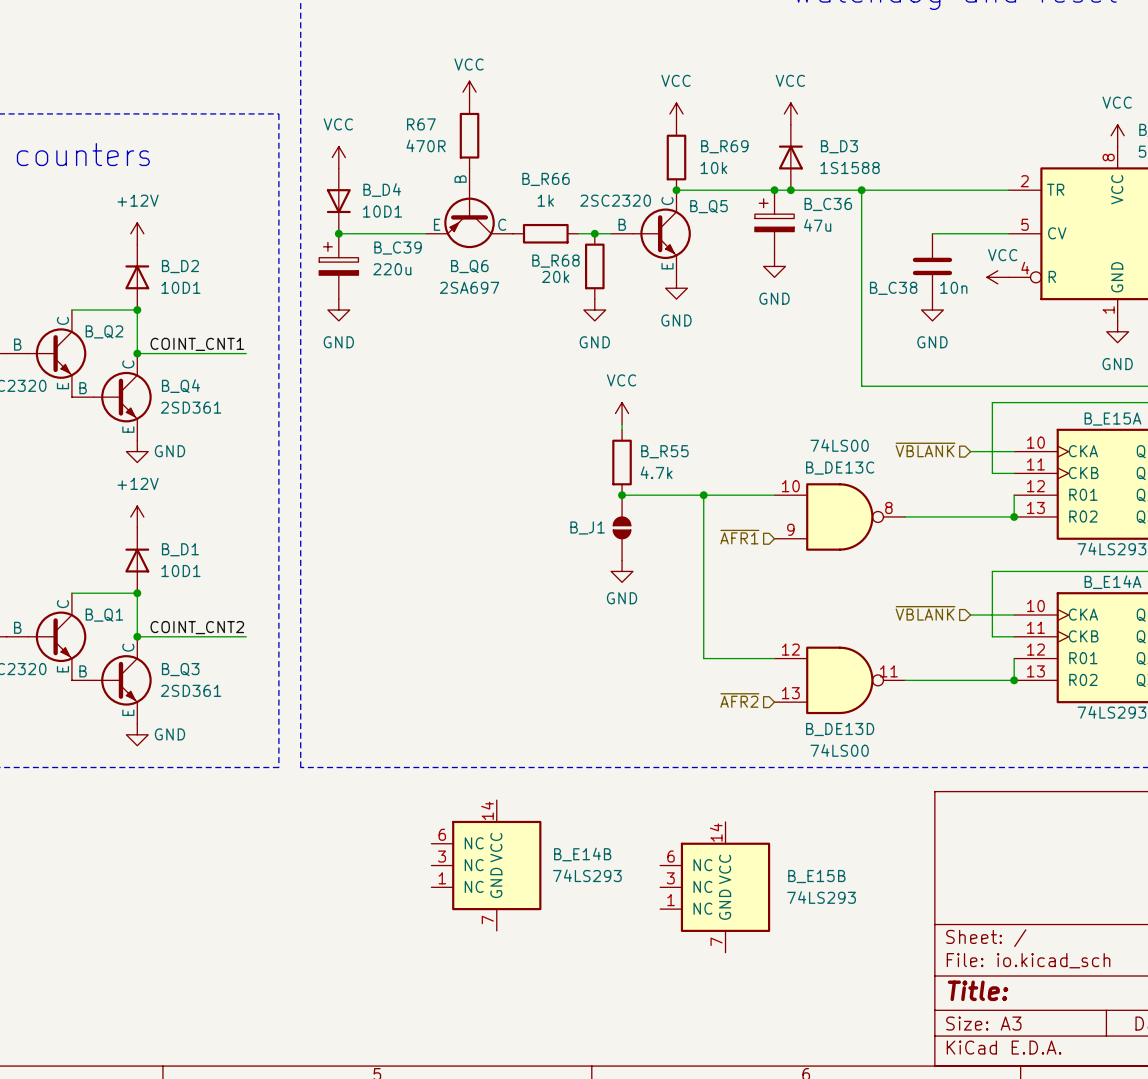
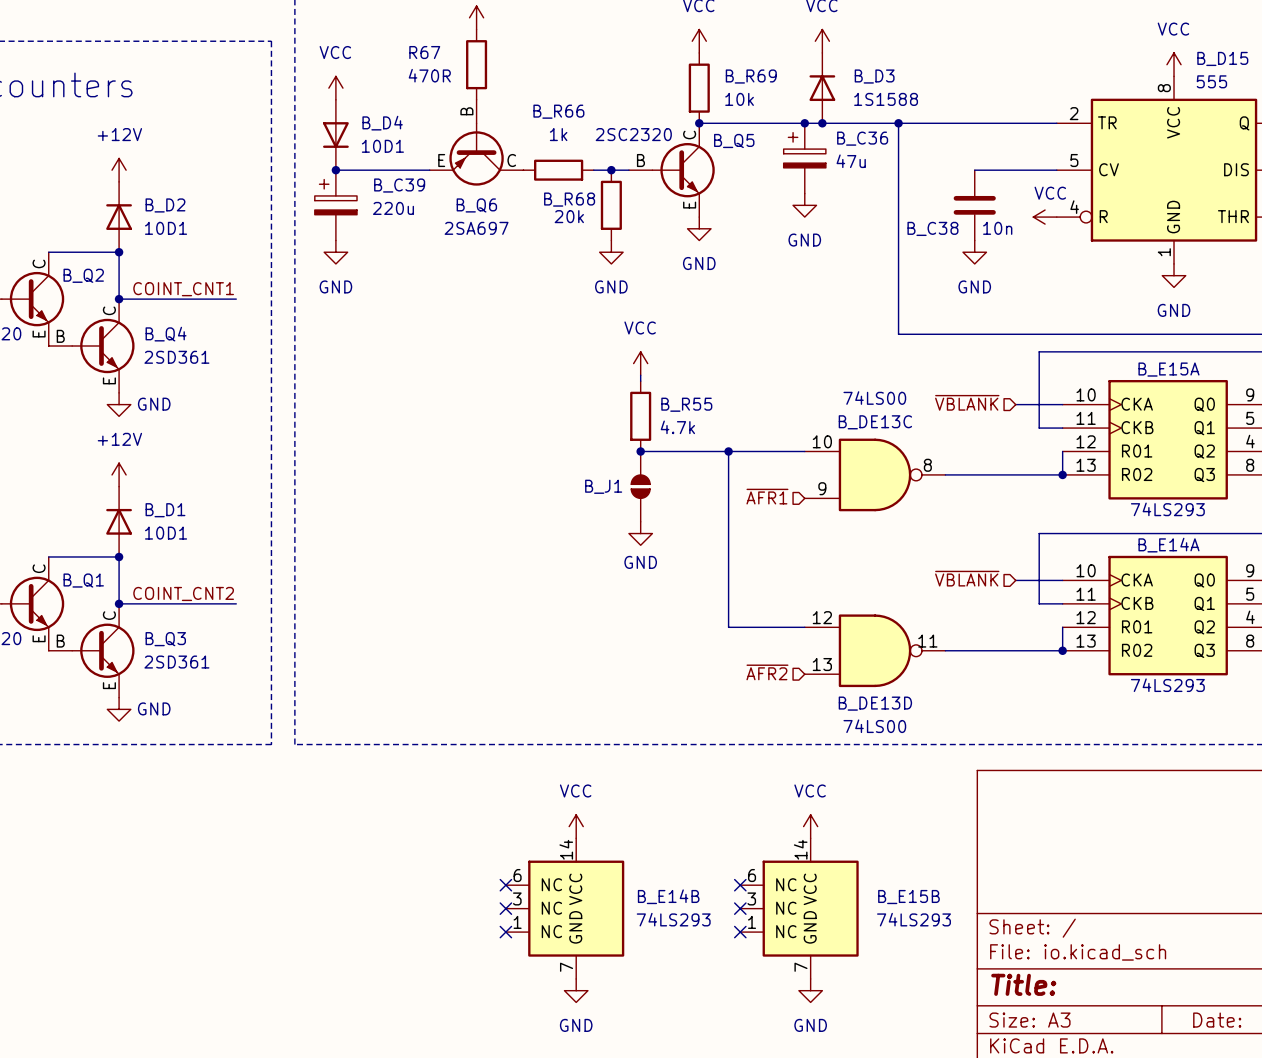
power symbol: none -> VCC (576, 826)
power symbol: none -> VCC (810, 826)
B_E14B position: (486, 865) -> (565, 908)
B_E15B position: (715, 887) -> (799, 908)
no-connect mark: none -> (505, 885)
no-connect mark: none -> (740, 885)
no-connect mark: none -> (505, 908)
no-connect mark: none -> (740, 908)
no-connect mark: none -> (505, 932)
no-connect mark: none -> (740, 932)
power symbol: none -> GND (576, 990)
power symbol: none -> GND (810, 990)

